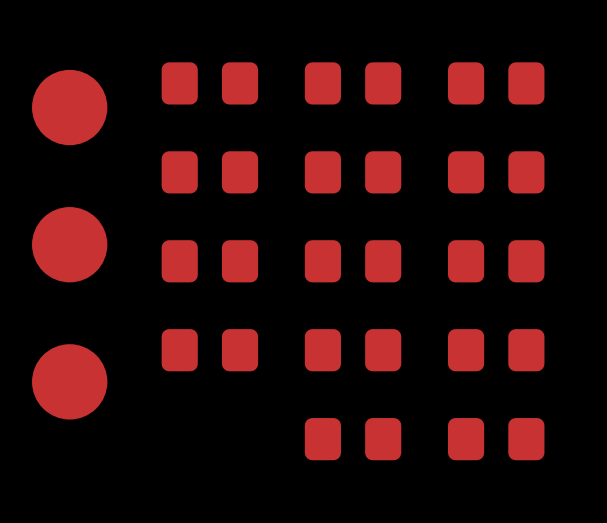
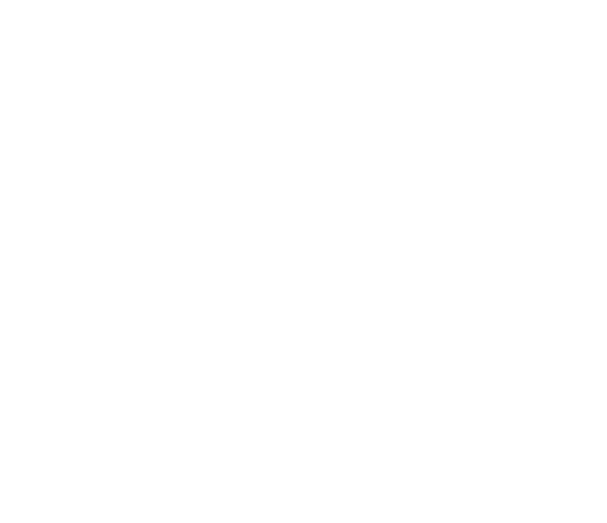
part: (209, 83) -> none
part: (353, 83) -> none
part: (496, 83) -> none
part: (69, 107) -> none
part: (209, 172) -> none
part: (353, 172) -> none
part: (496, 172) -> none
part: (69, 244) -> none
part: (209, 261) -> none
part: (353, 261) -> none
part: (496, 261) -> none
part: (209, 350) -> none
part: (353, 350) -> none
part: (496, 350) -> none
part: (69, 381) -> none
part: (353, 439) -> none
part: (496, 439) -> none

